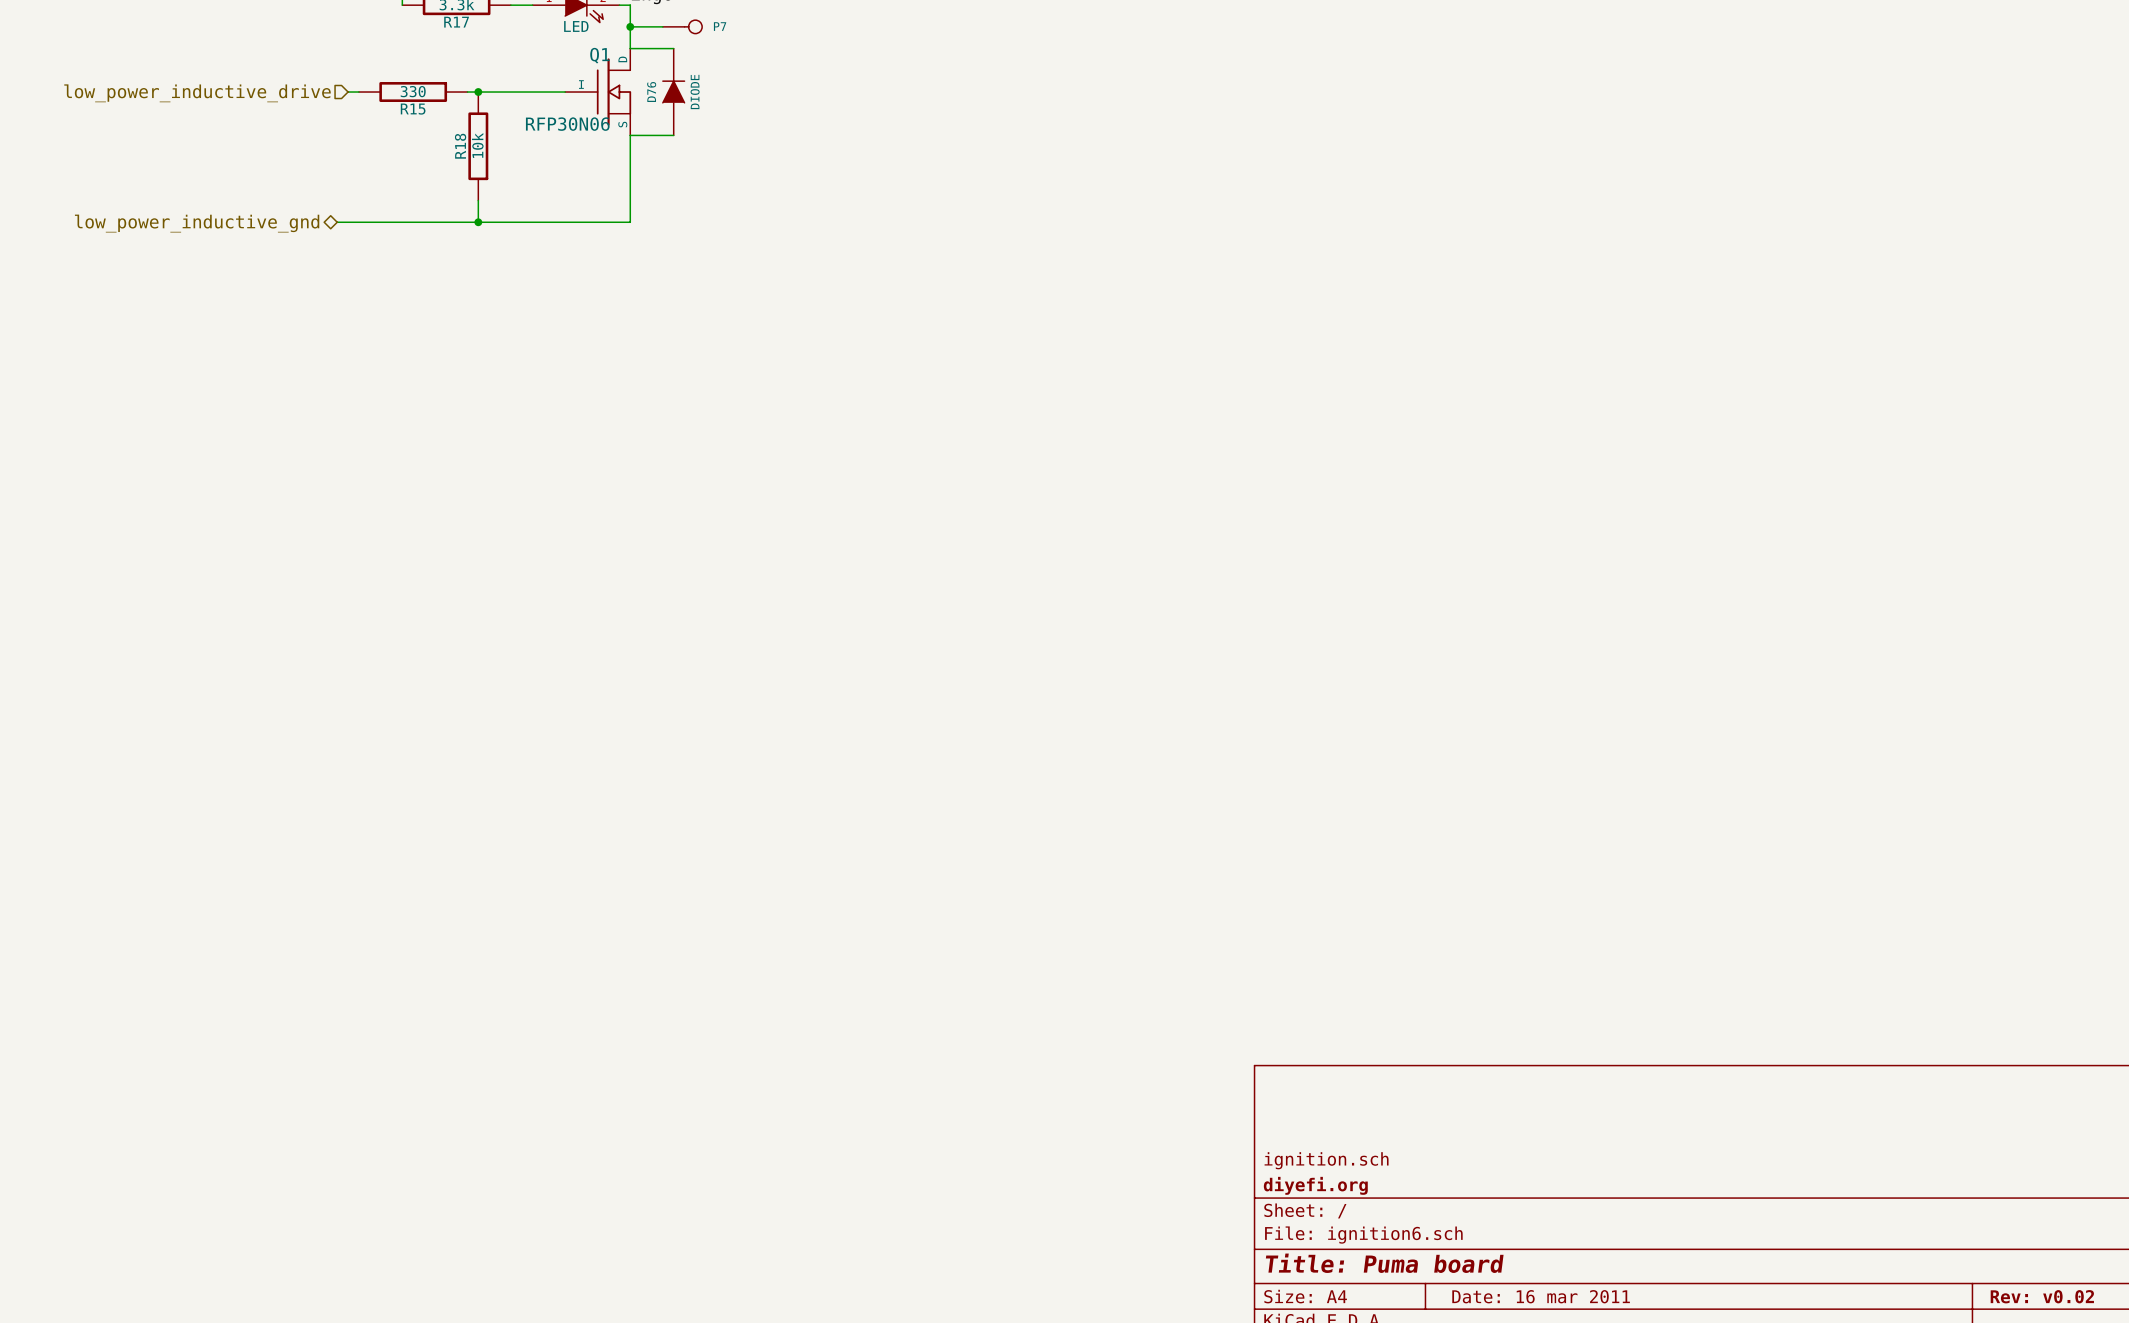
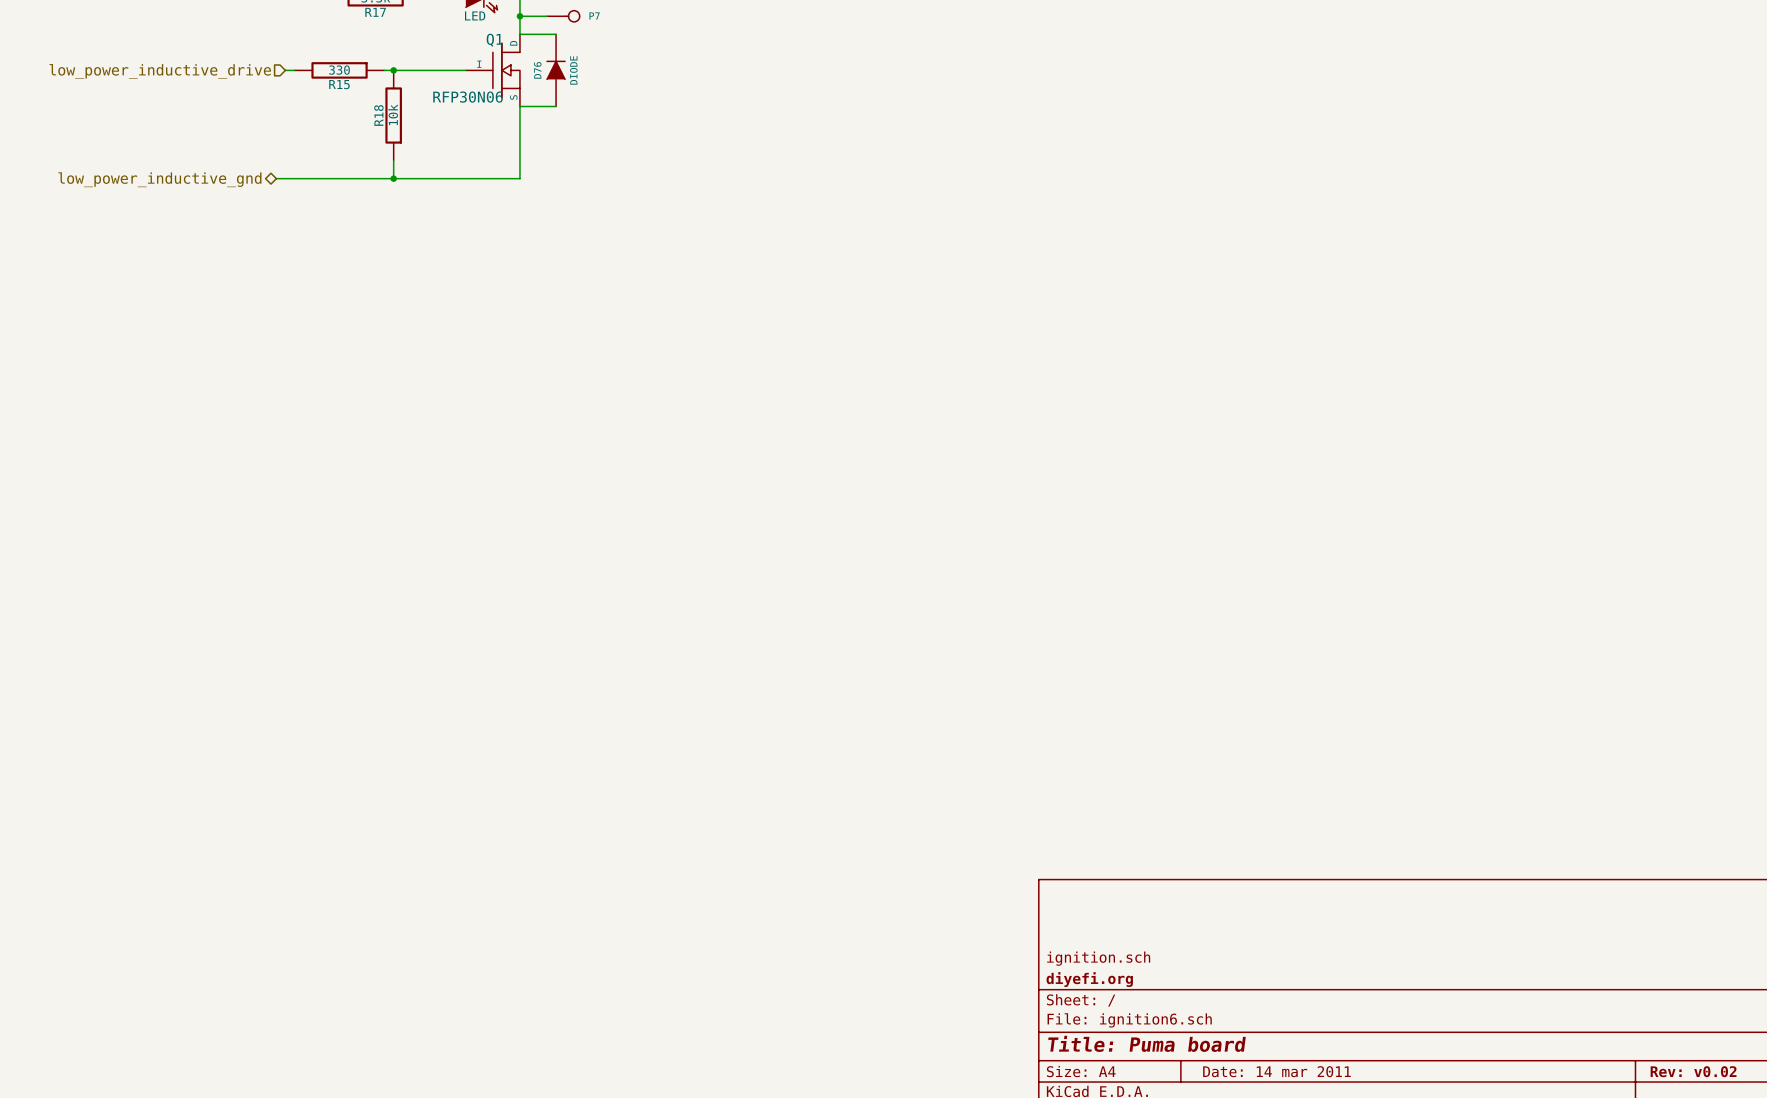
title block: Date: 16 mar 2011 (1541, 1296) -> Date: 14 mar 2011 (1276, 1071)

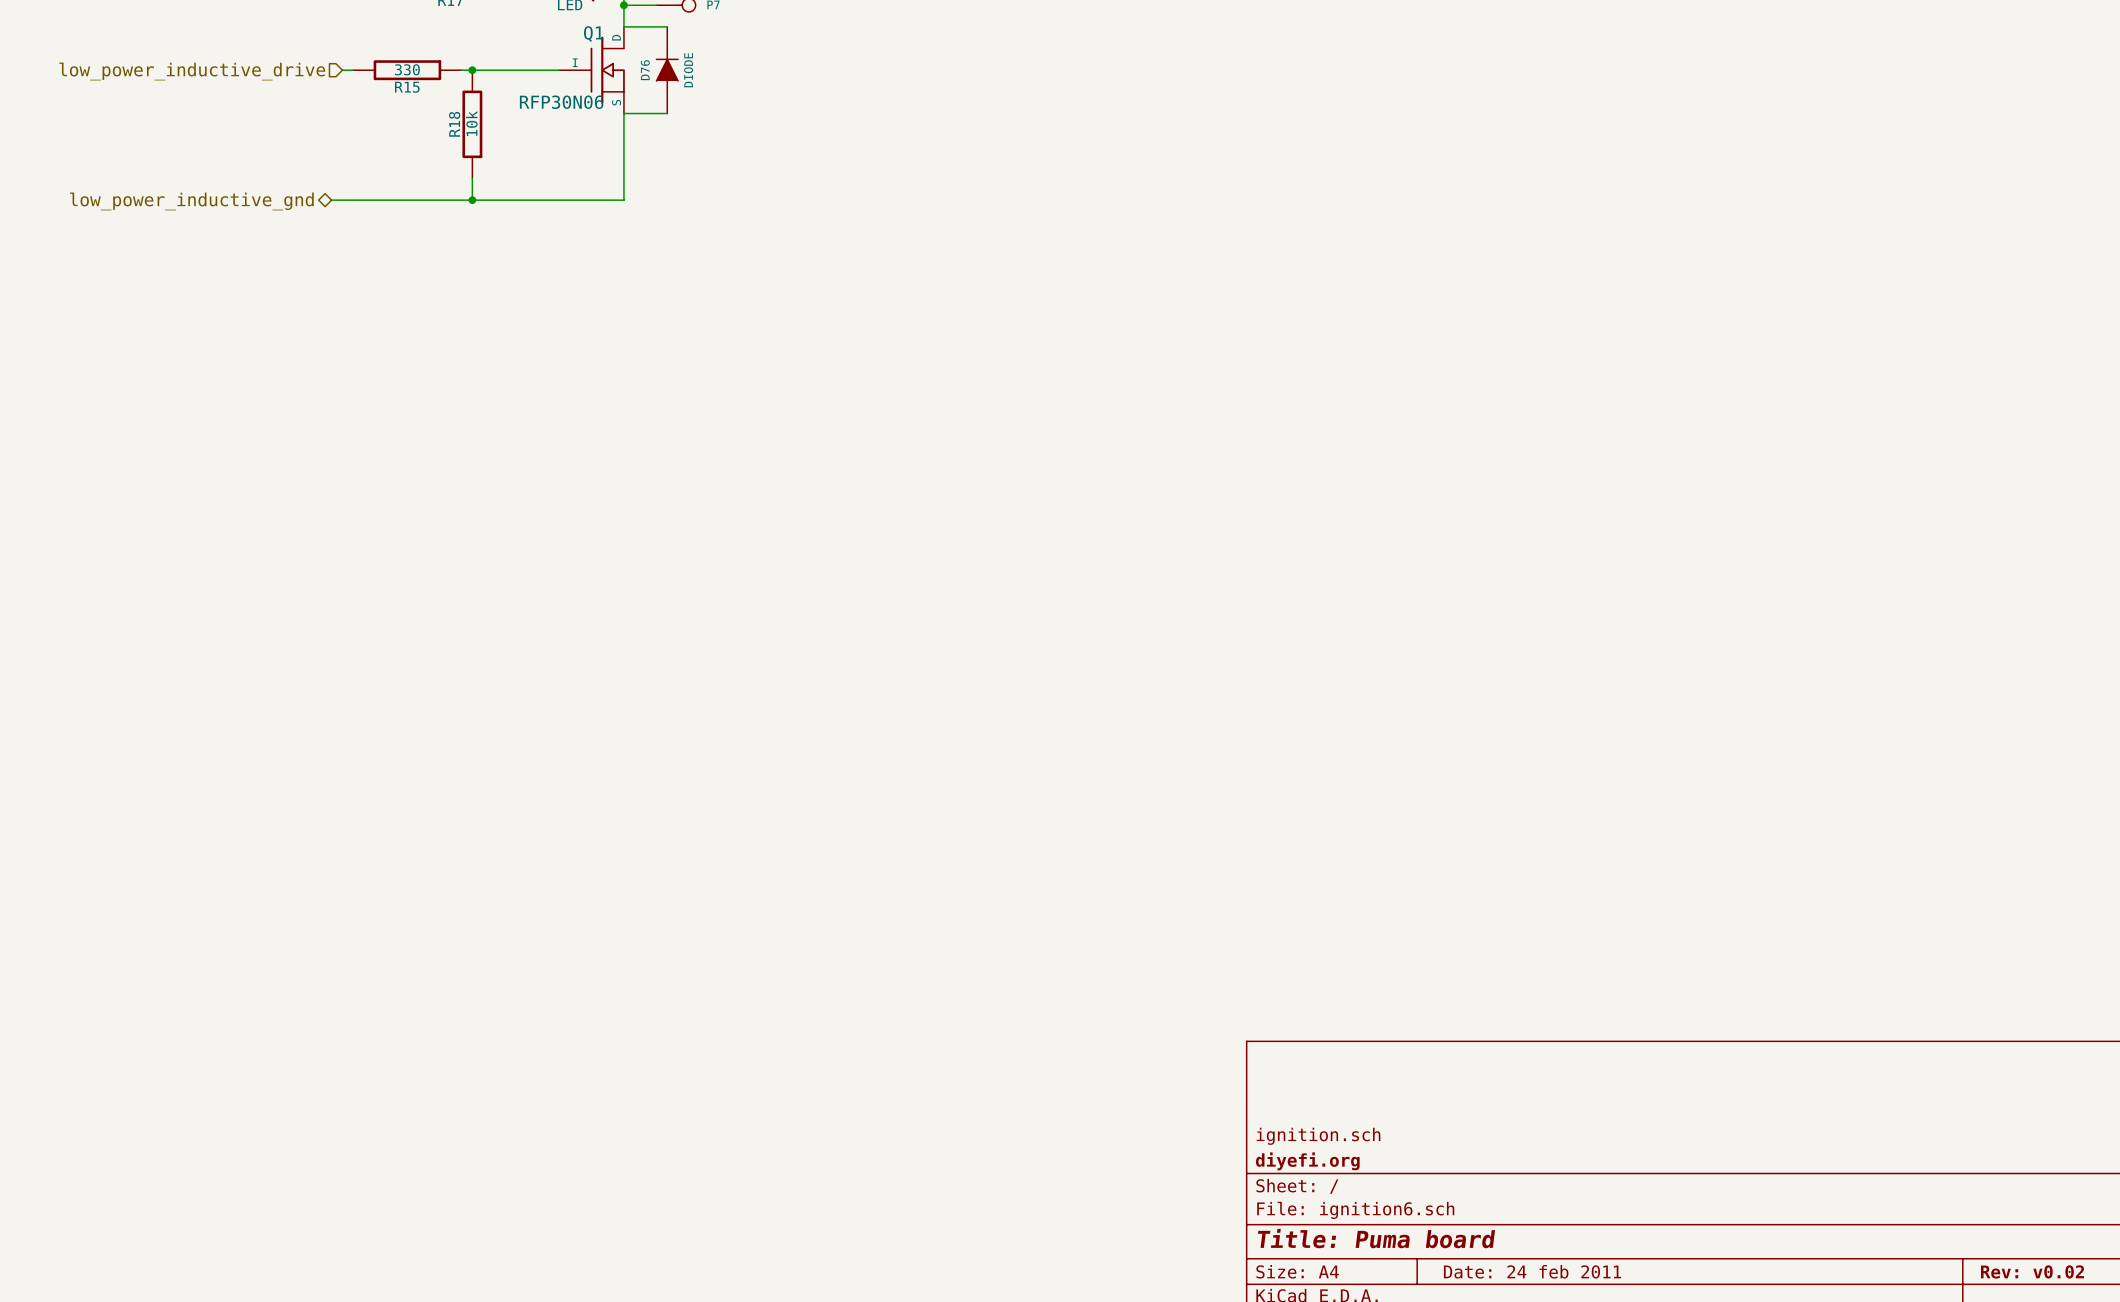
title block: Date: 14 mar 2011 (1276, 1071) -> Date: 24 feb 2011 (1532, 1271)

